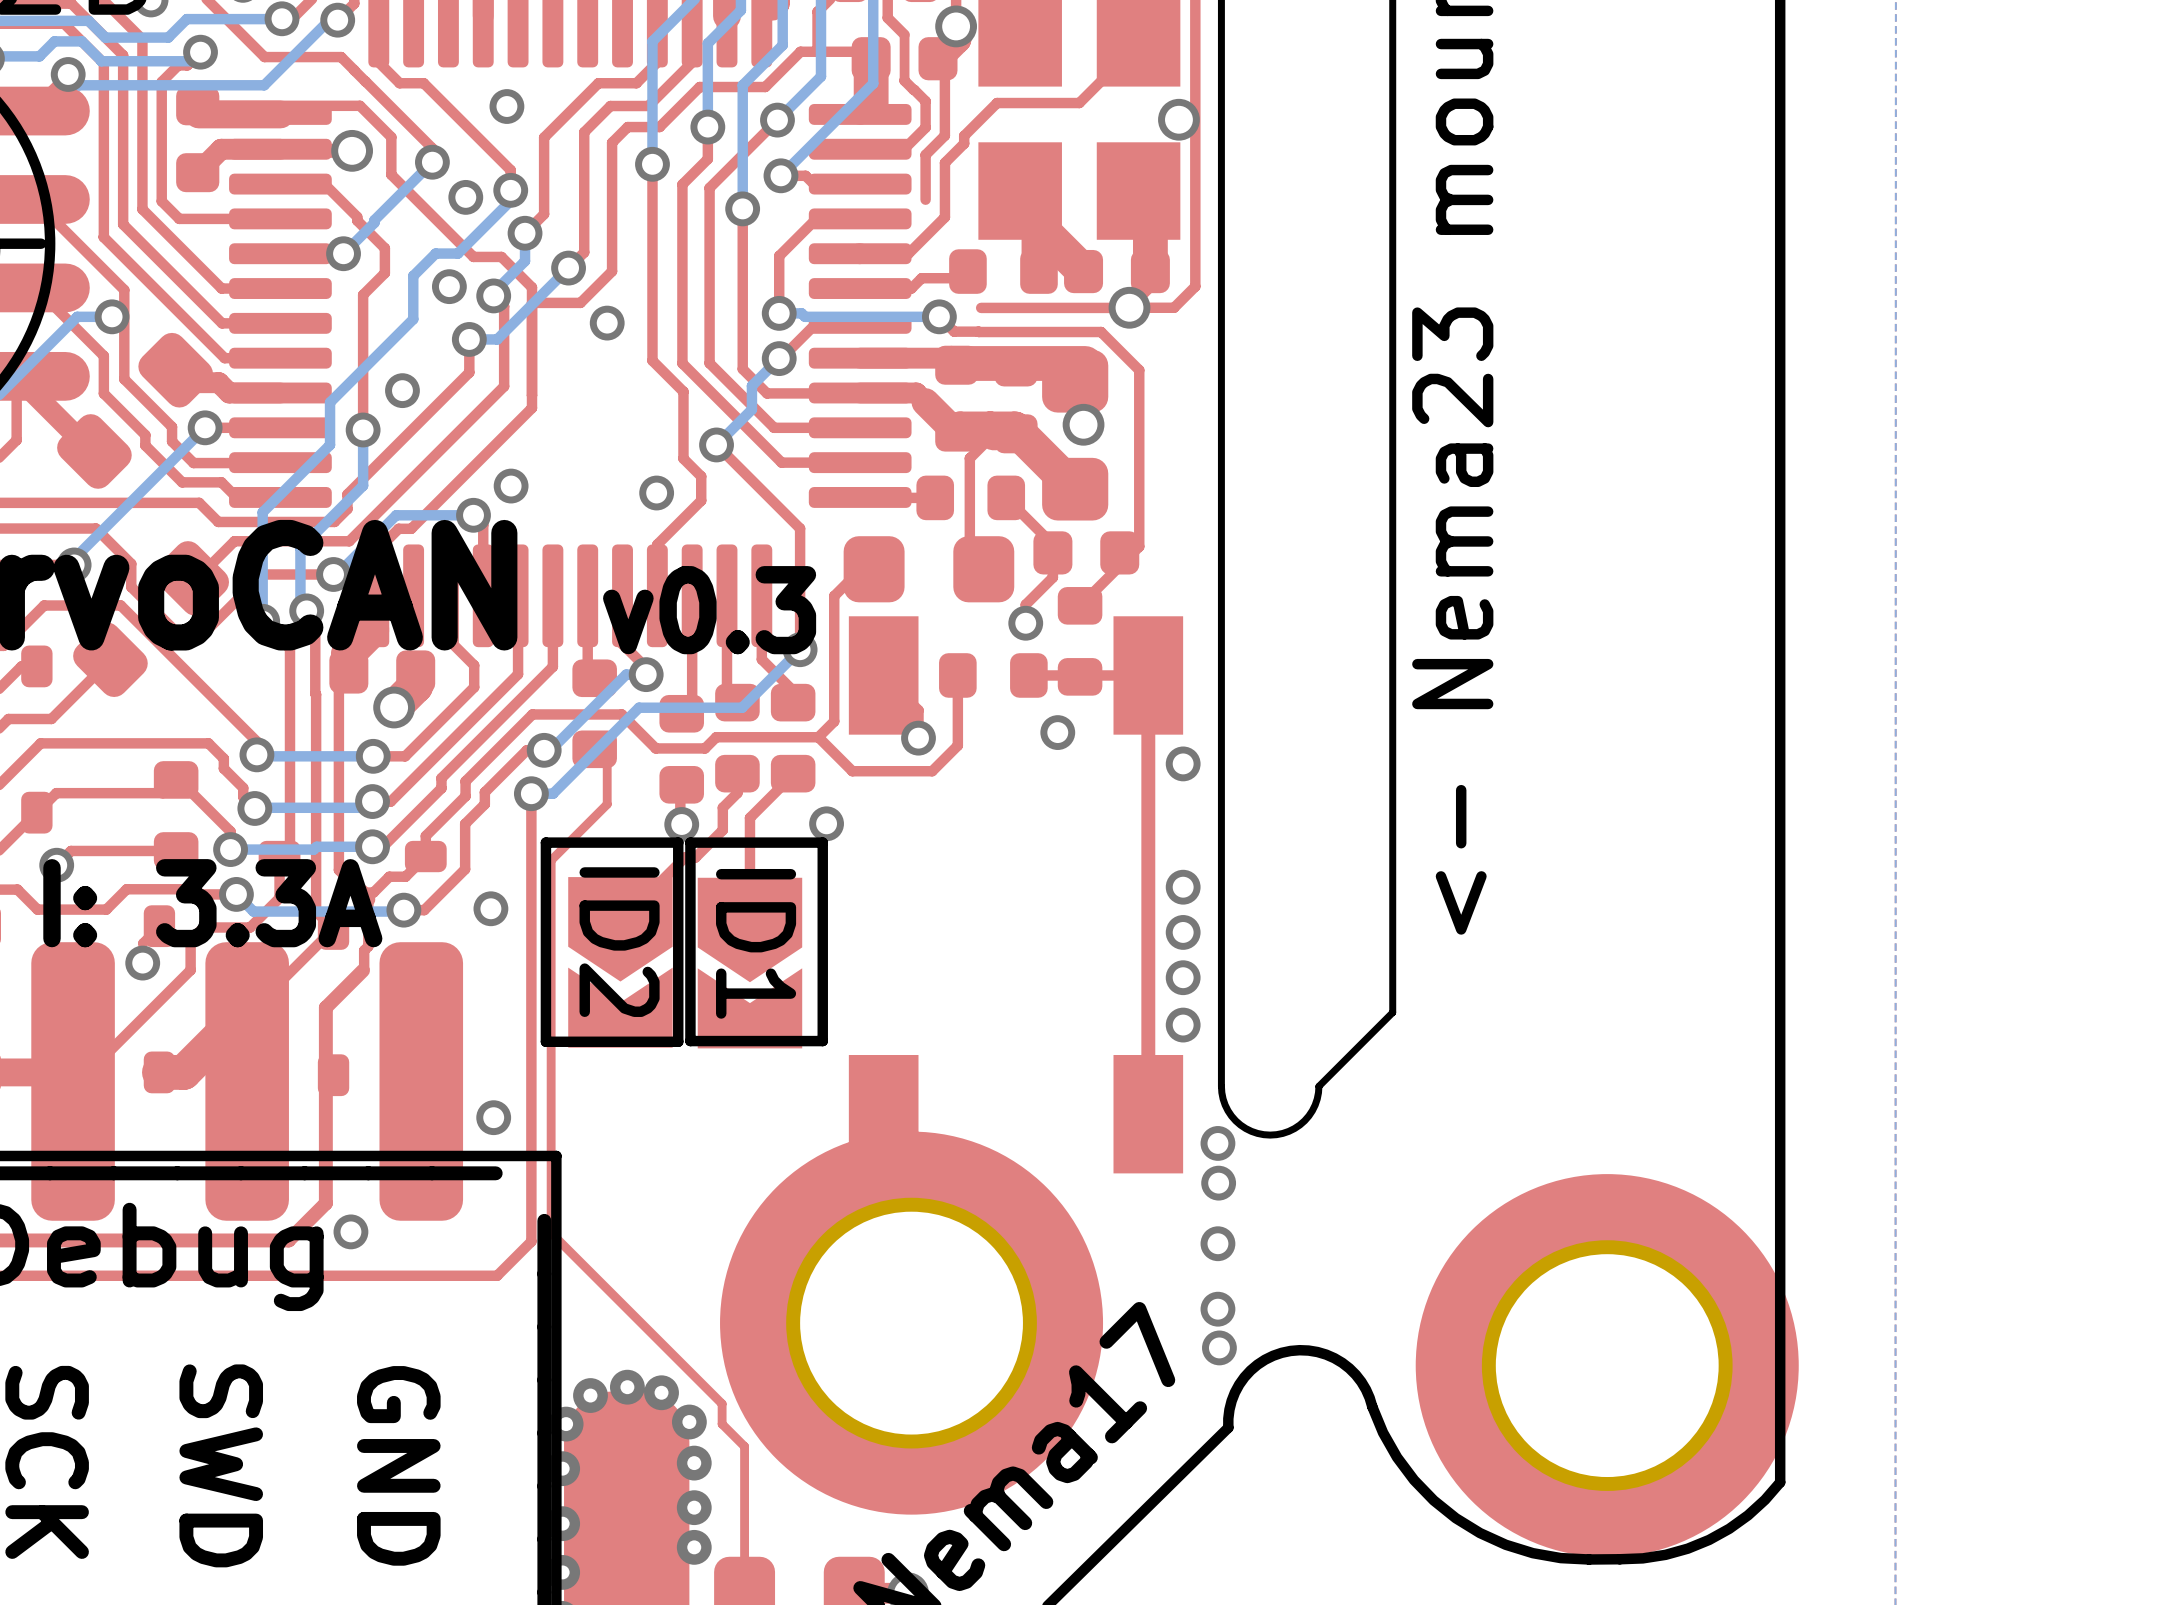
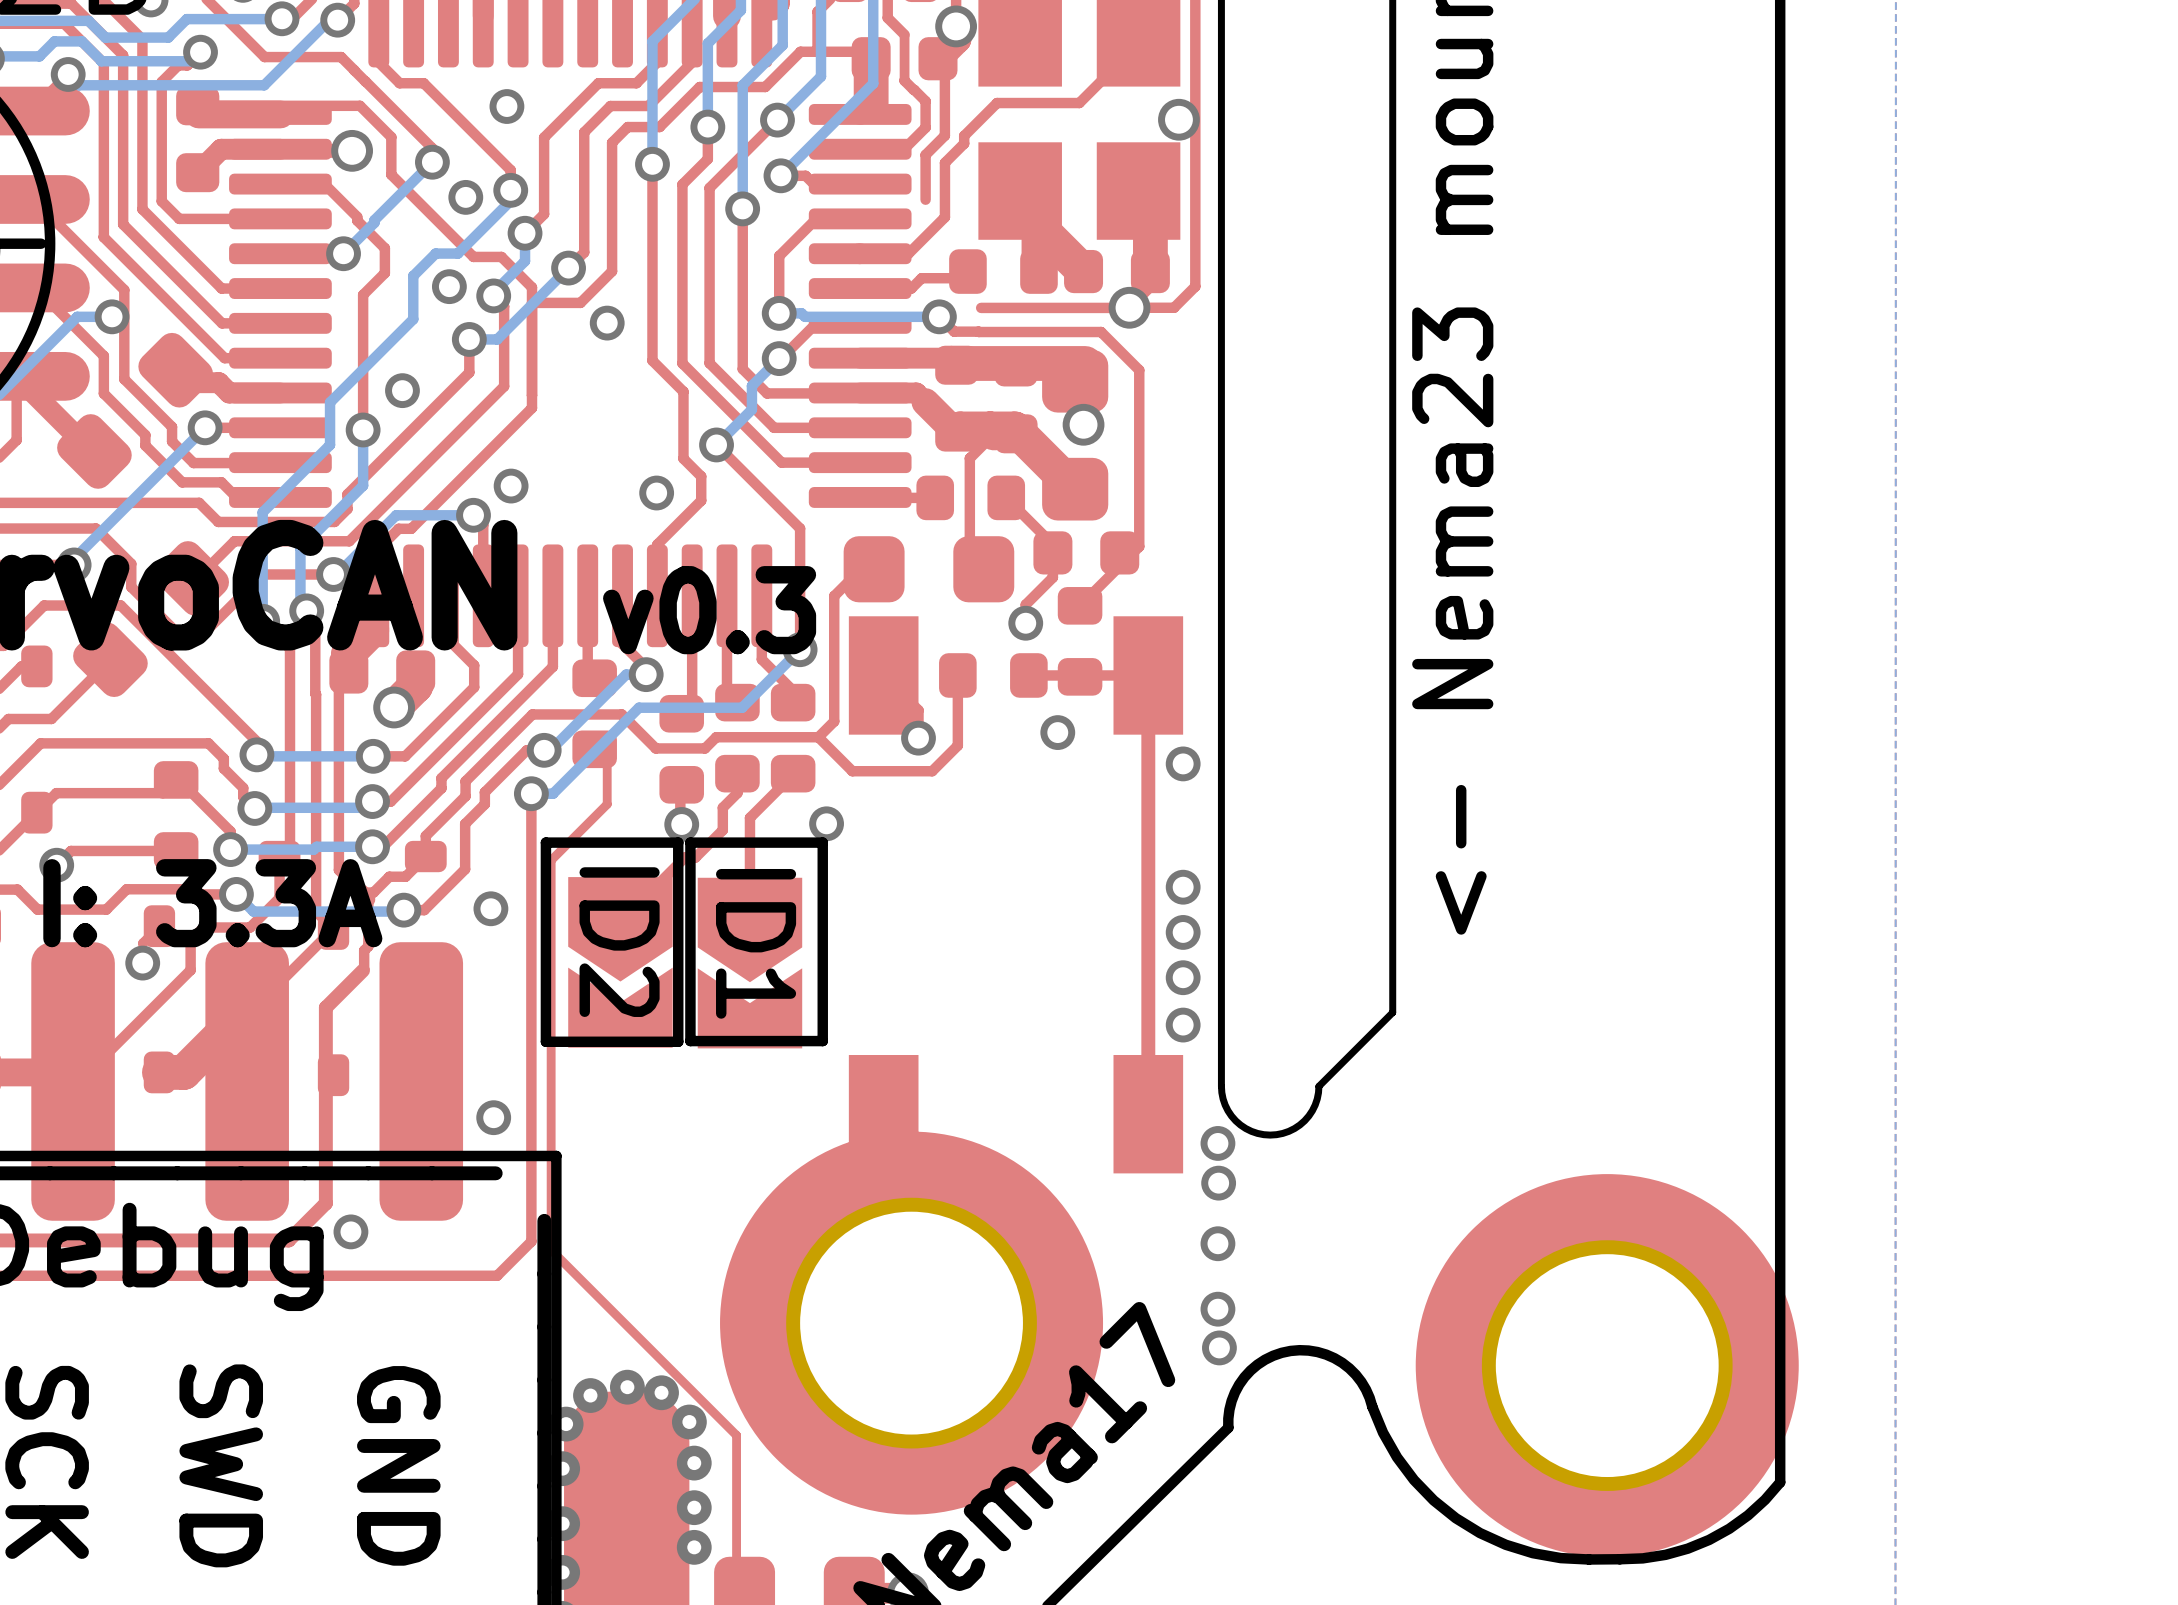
top track: (551, 1232) (722, 1403) (722, 1424) (744, 1446) (744, 1589) -> (551, 1232) (551, 1249) (736, 1435) (736, 1587)

